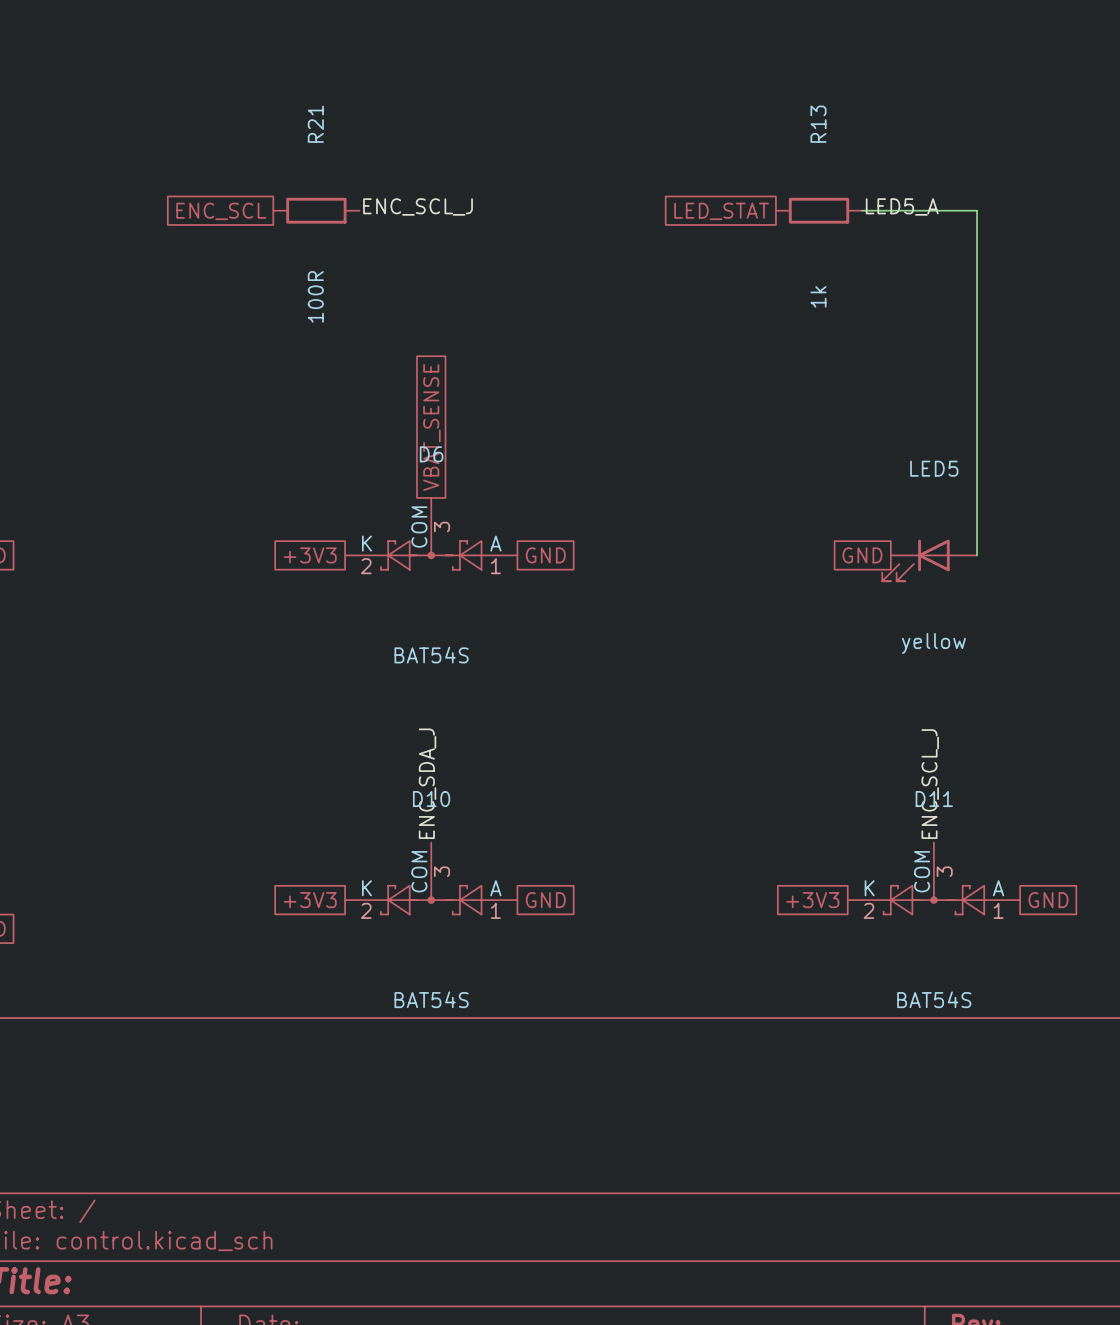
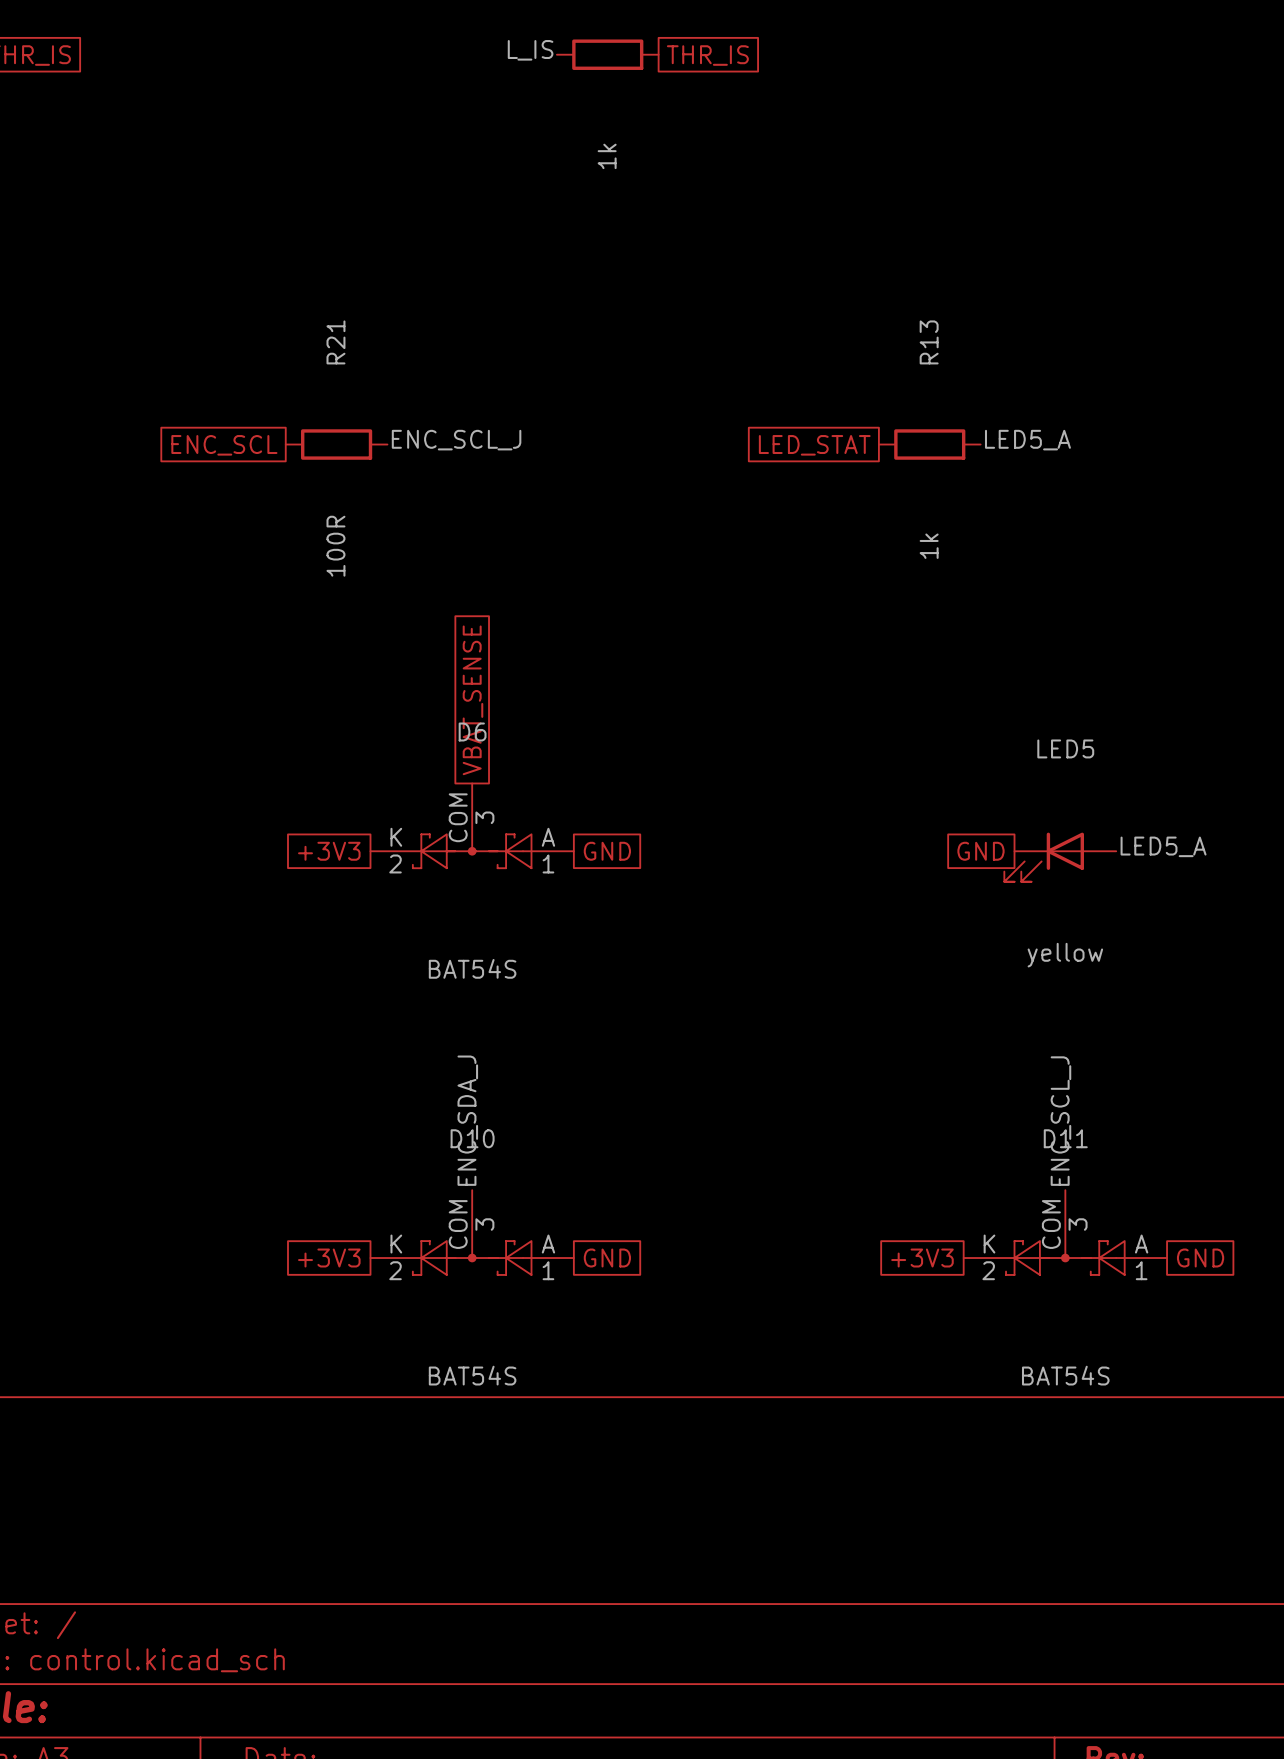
wire: (862, 210) (977, 210) (977, 555) -> none
label: none -> LED5_A (1163, 846)

